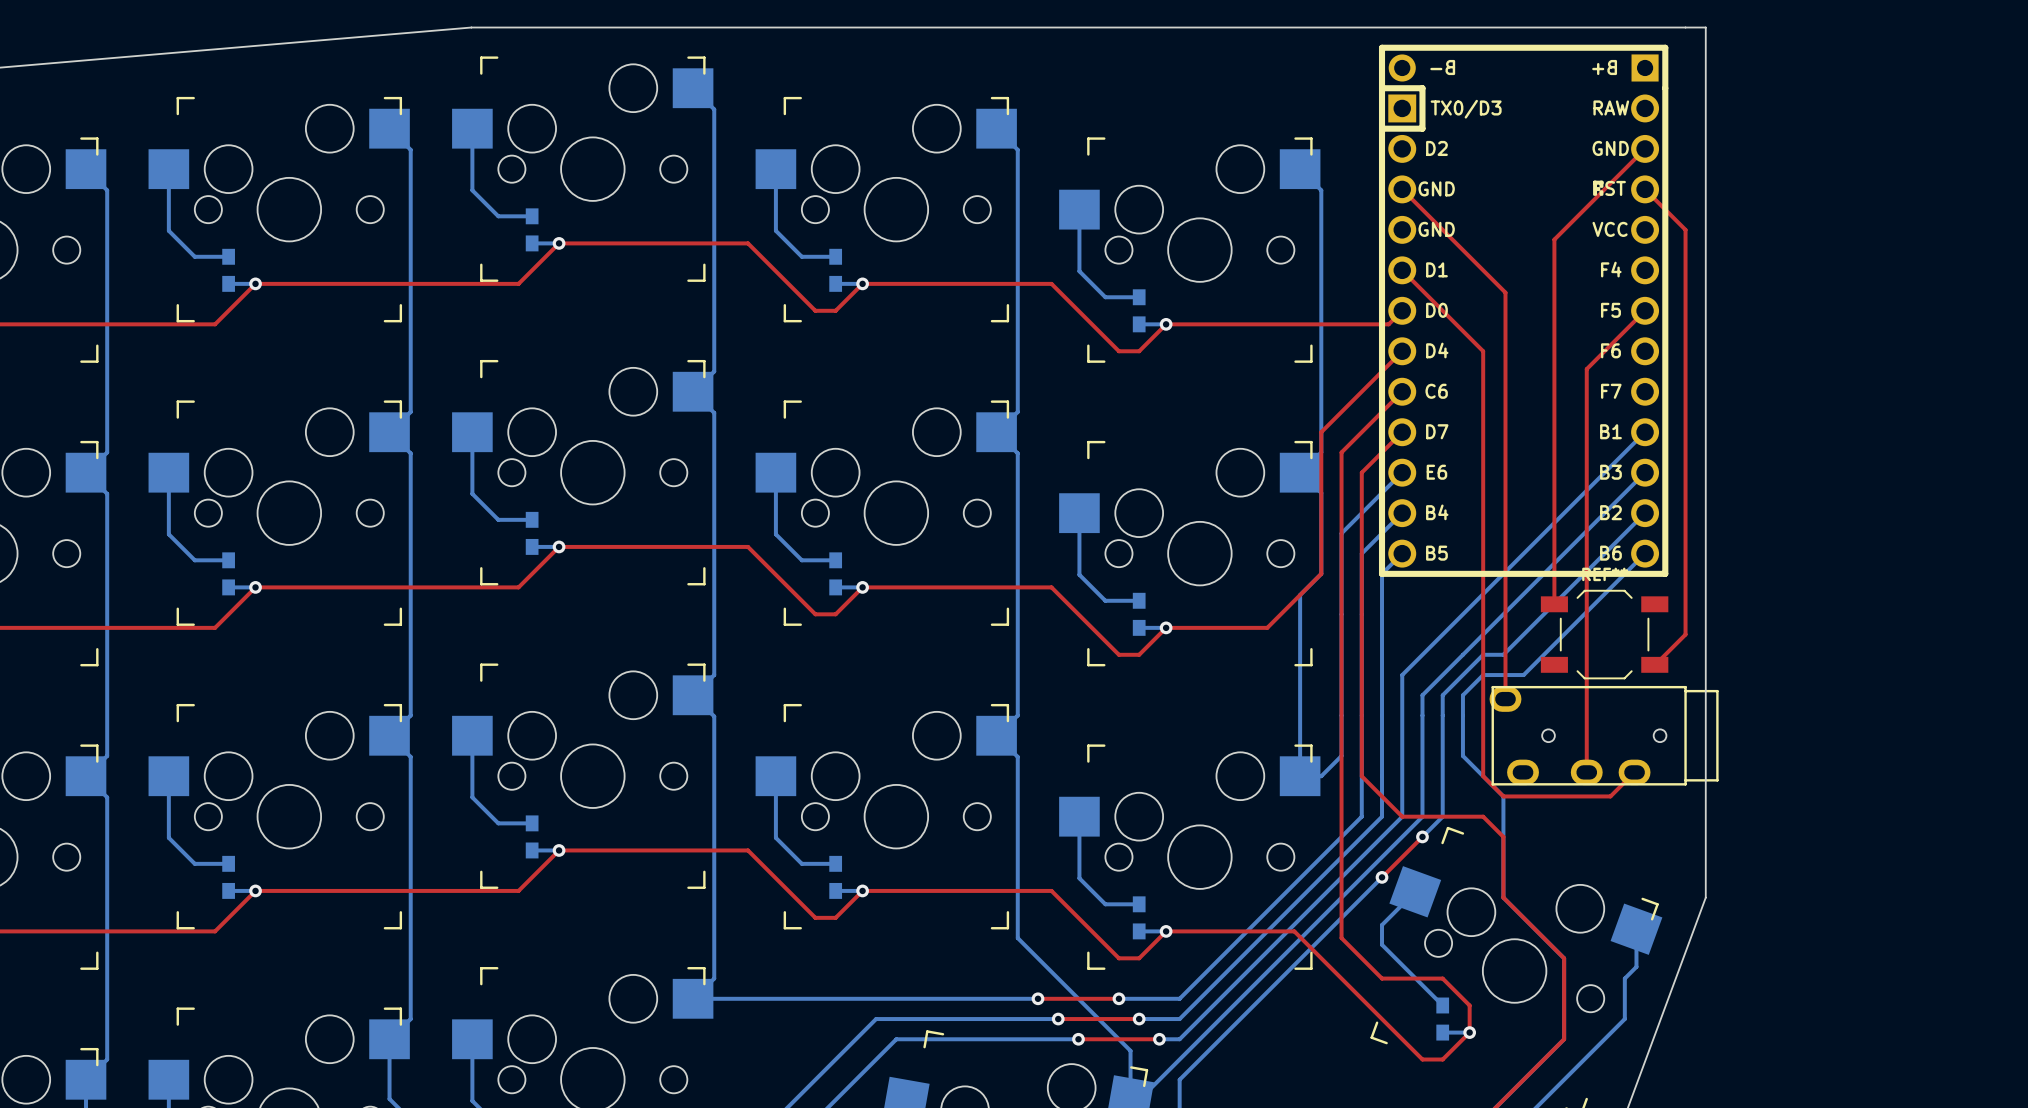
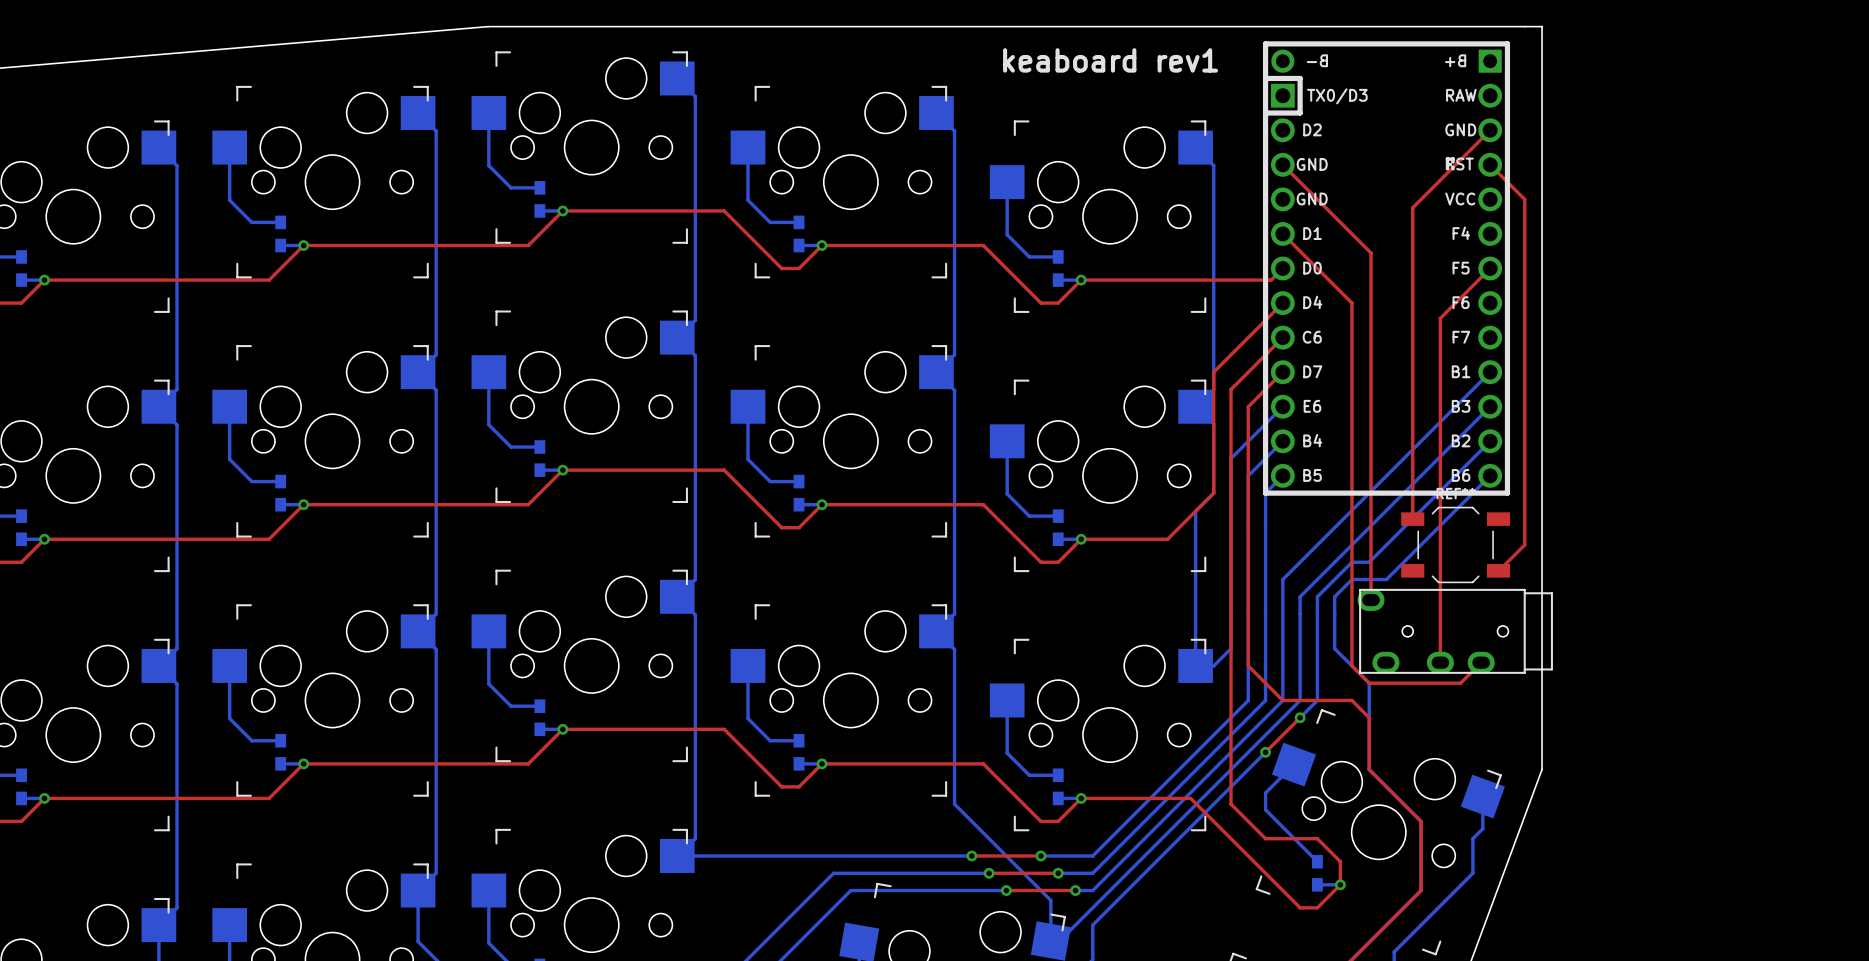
text: none -> keaboard rev1 (1110, 60)

